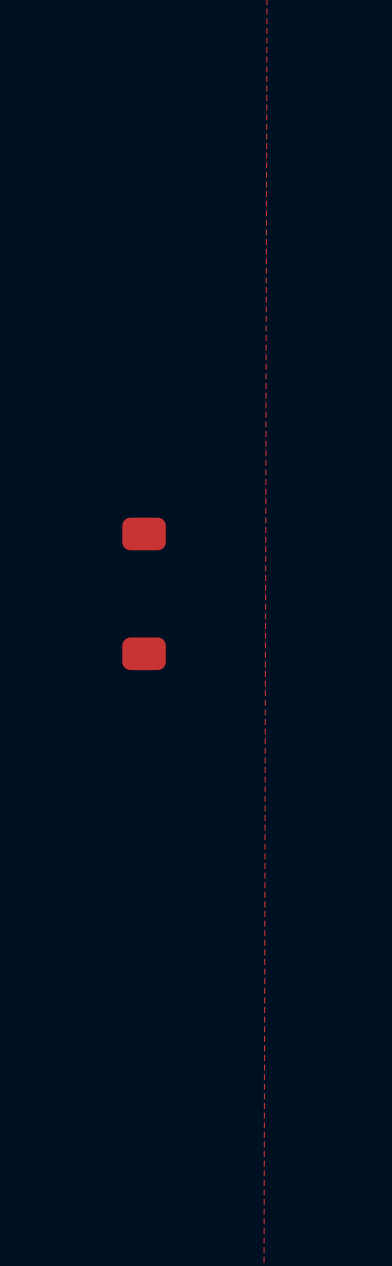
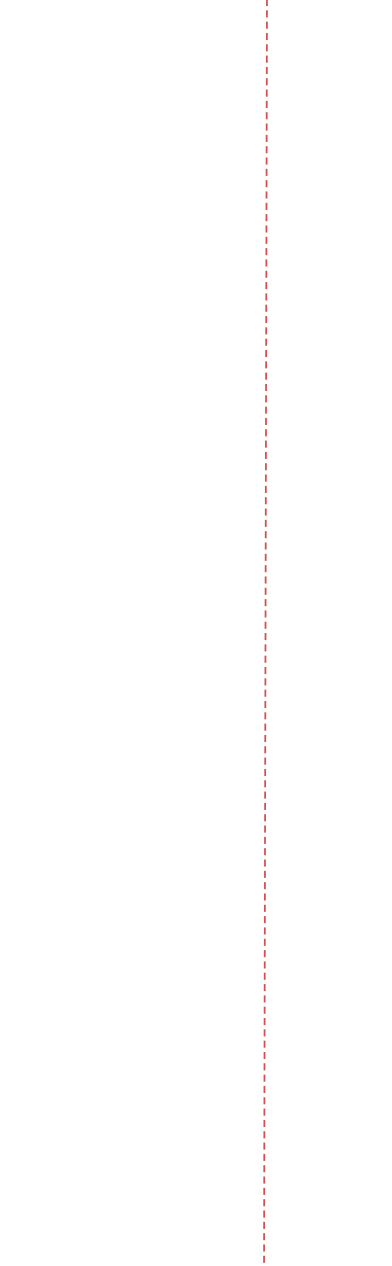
part: (144, 593) -> none

